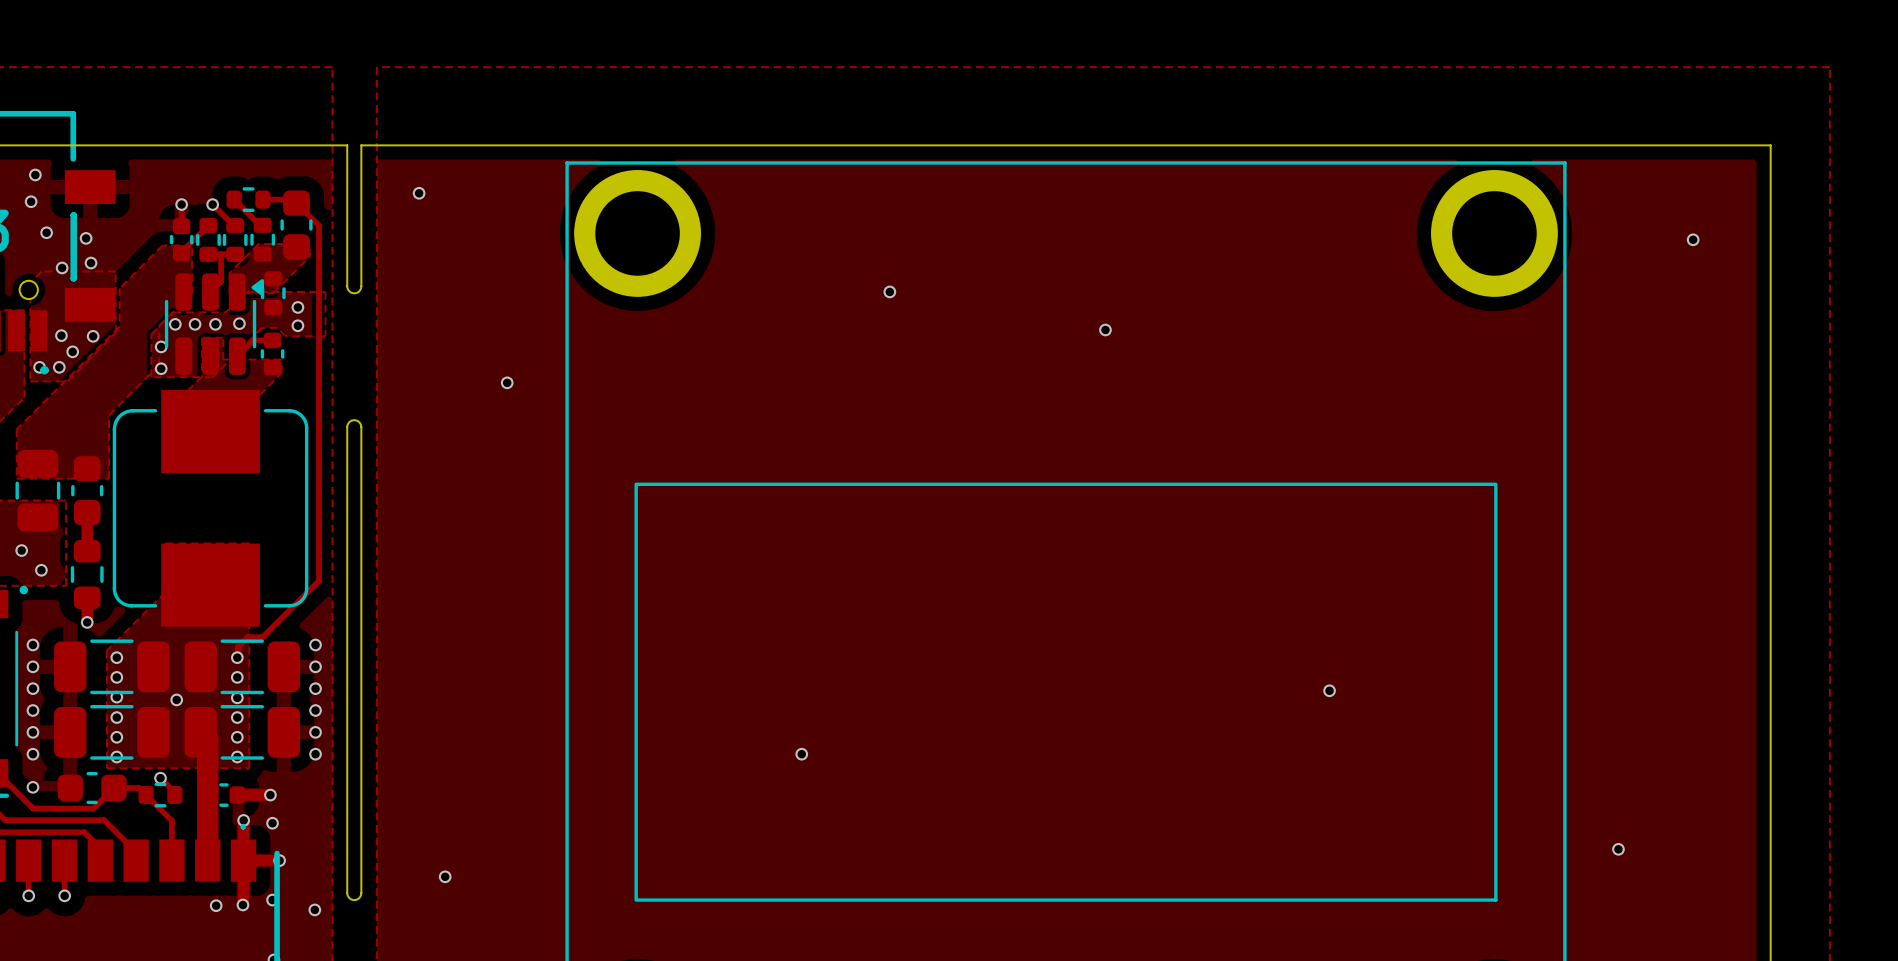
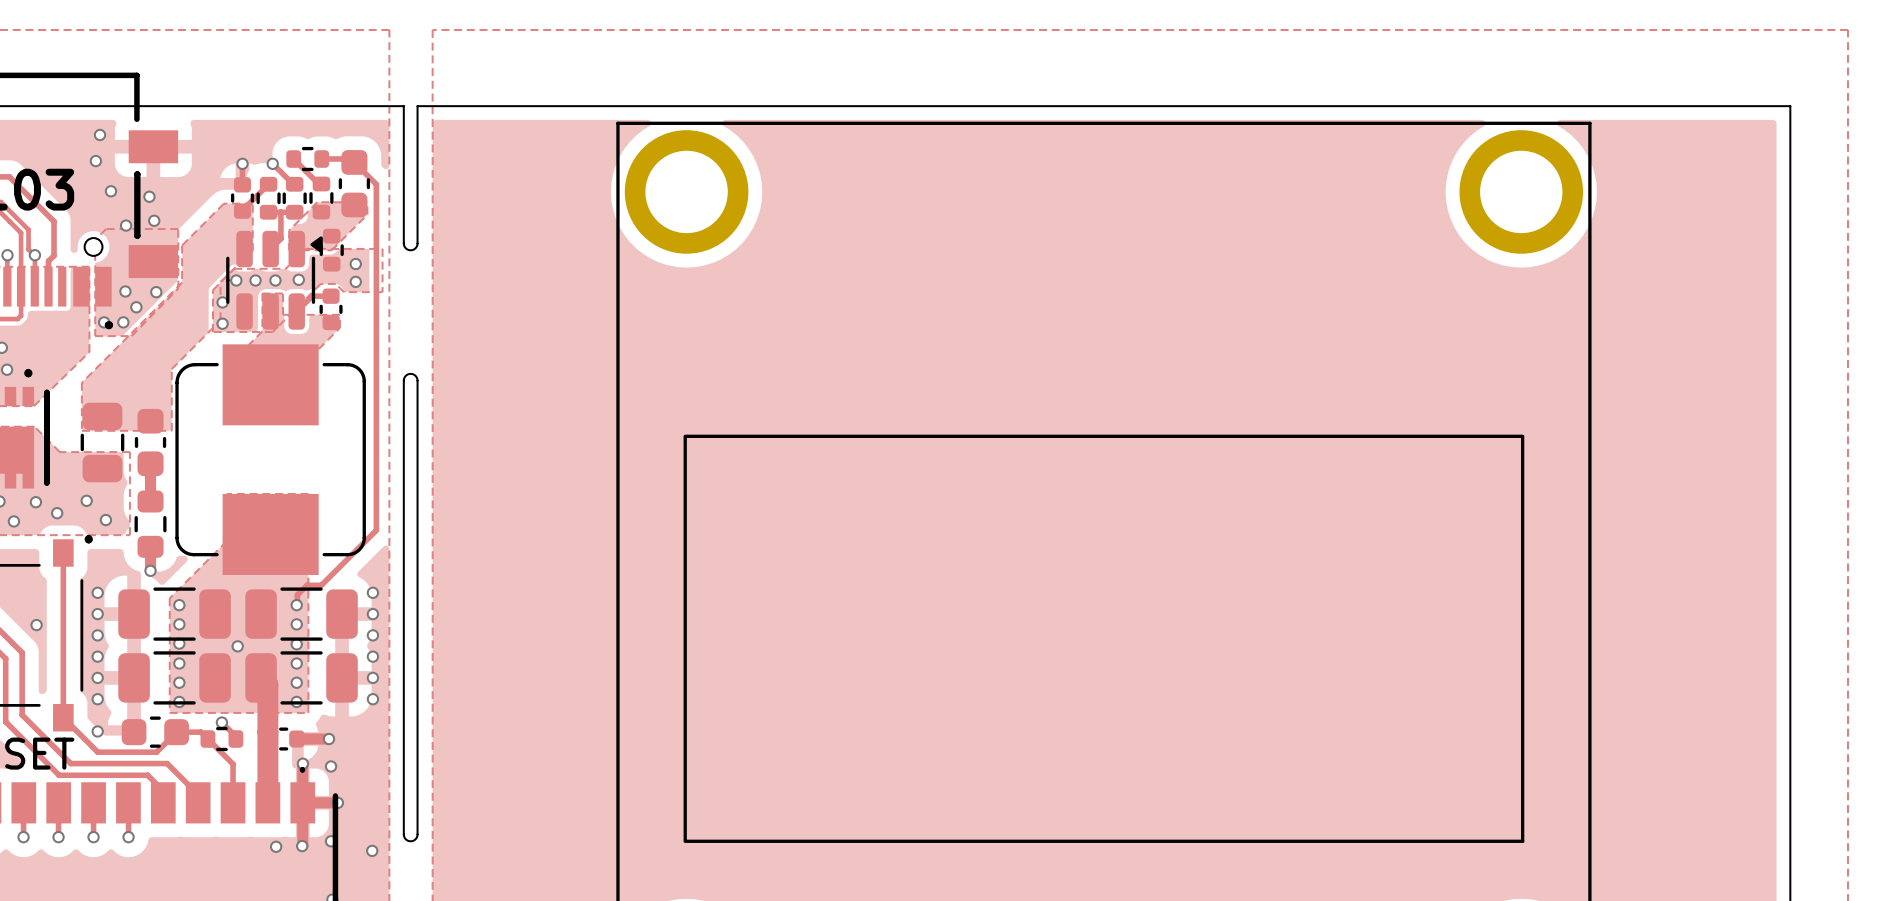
via: (419, 193) -> none
via: (1693, 239) -> none
via: (889, 291) -> none
via: (1105, 329) -> none
via: (507, 382) -> none
via: (1329, 690) -> none
via: (801, 754) -> none
via: (1618, 849) -> none
via: (445, 876) -> none

